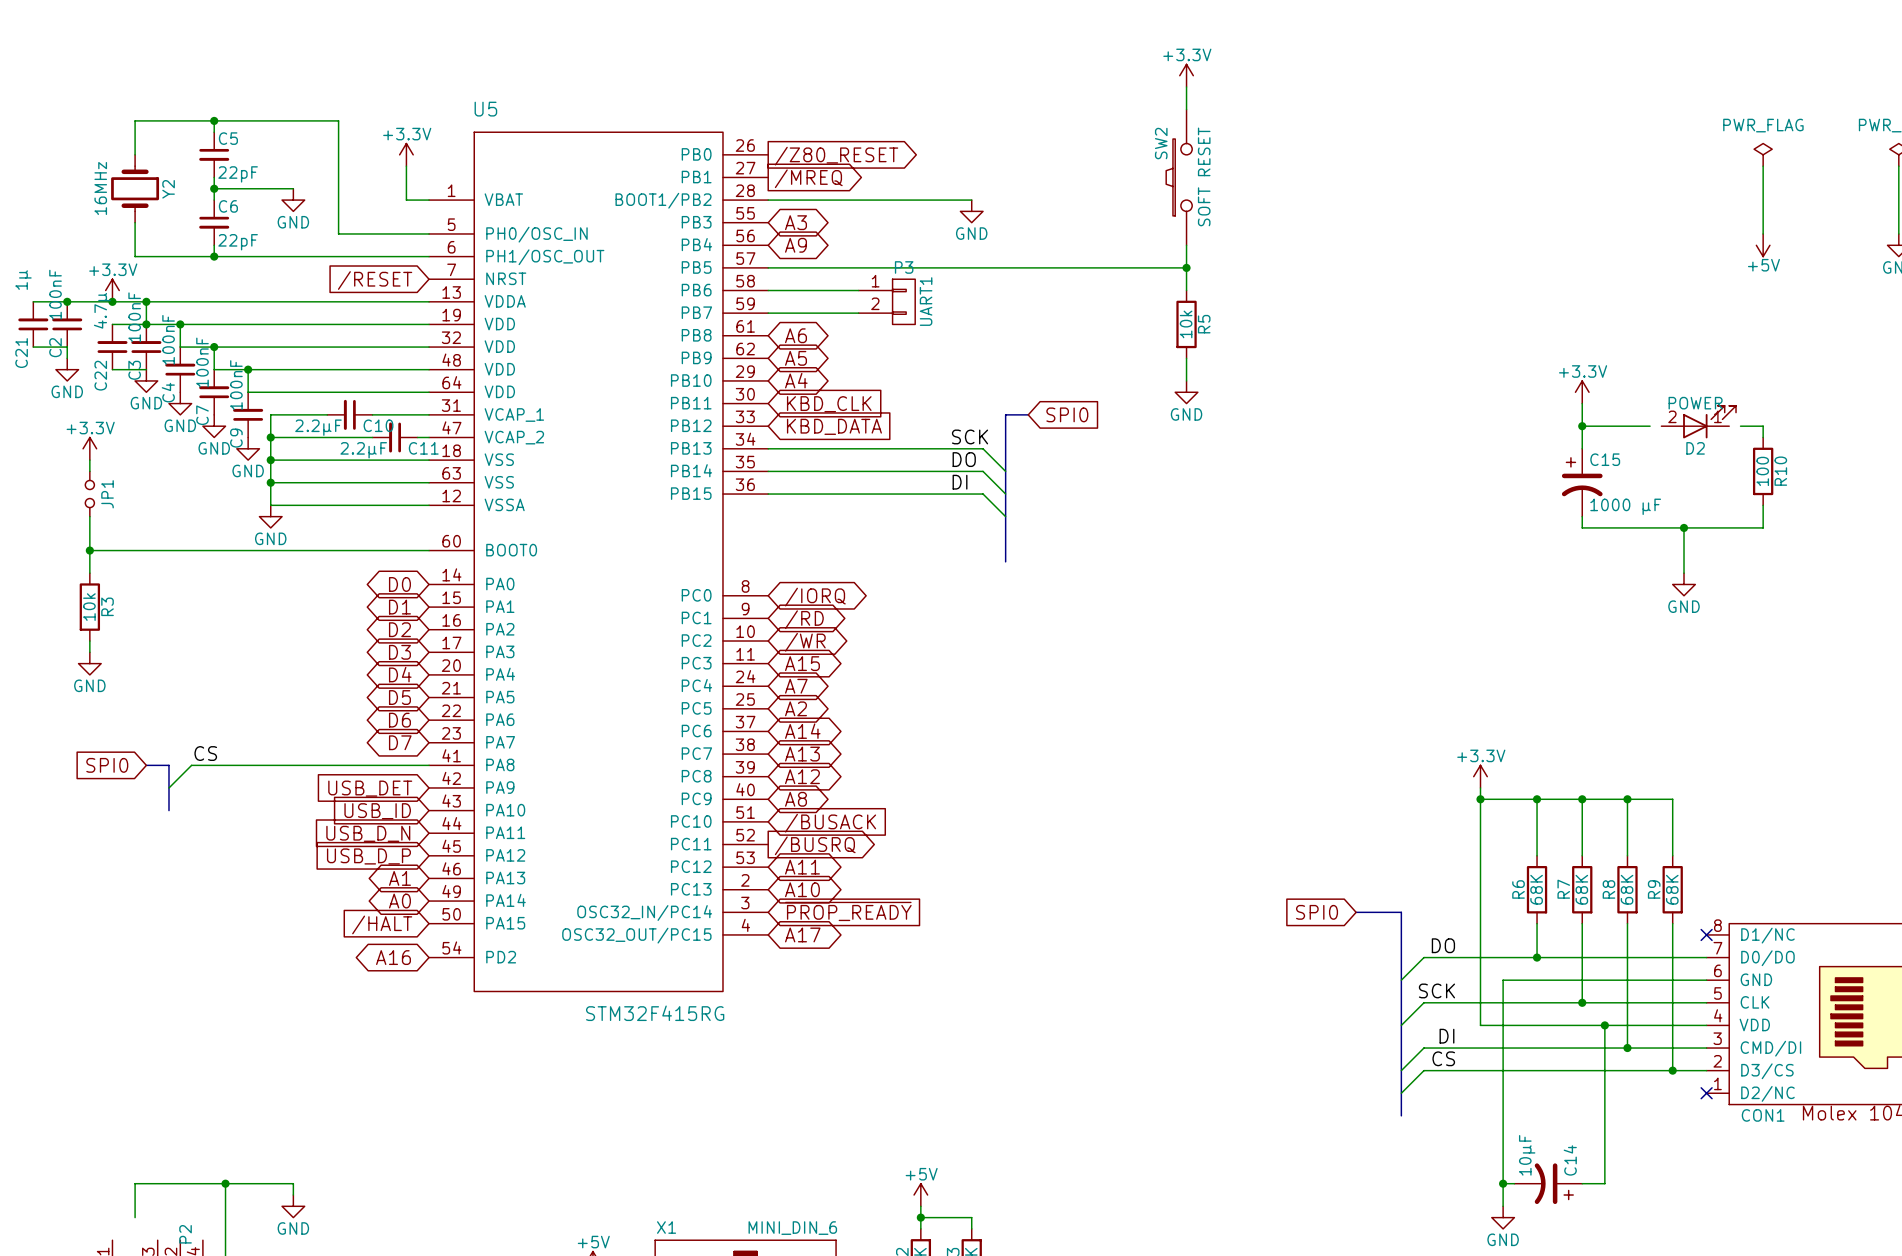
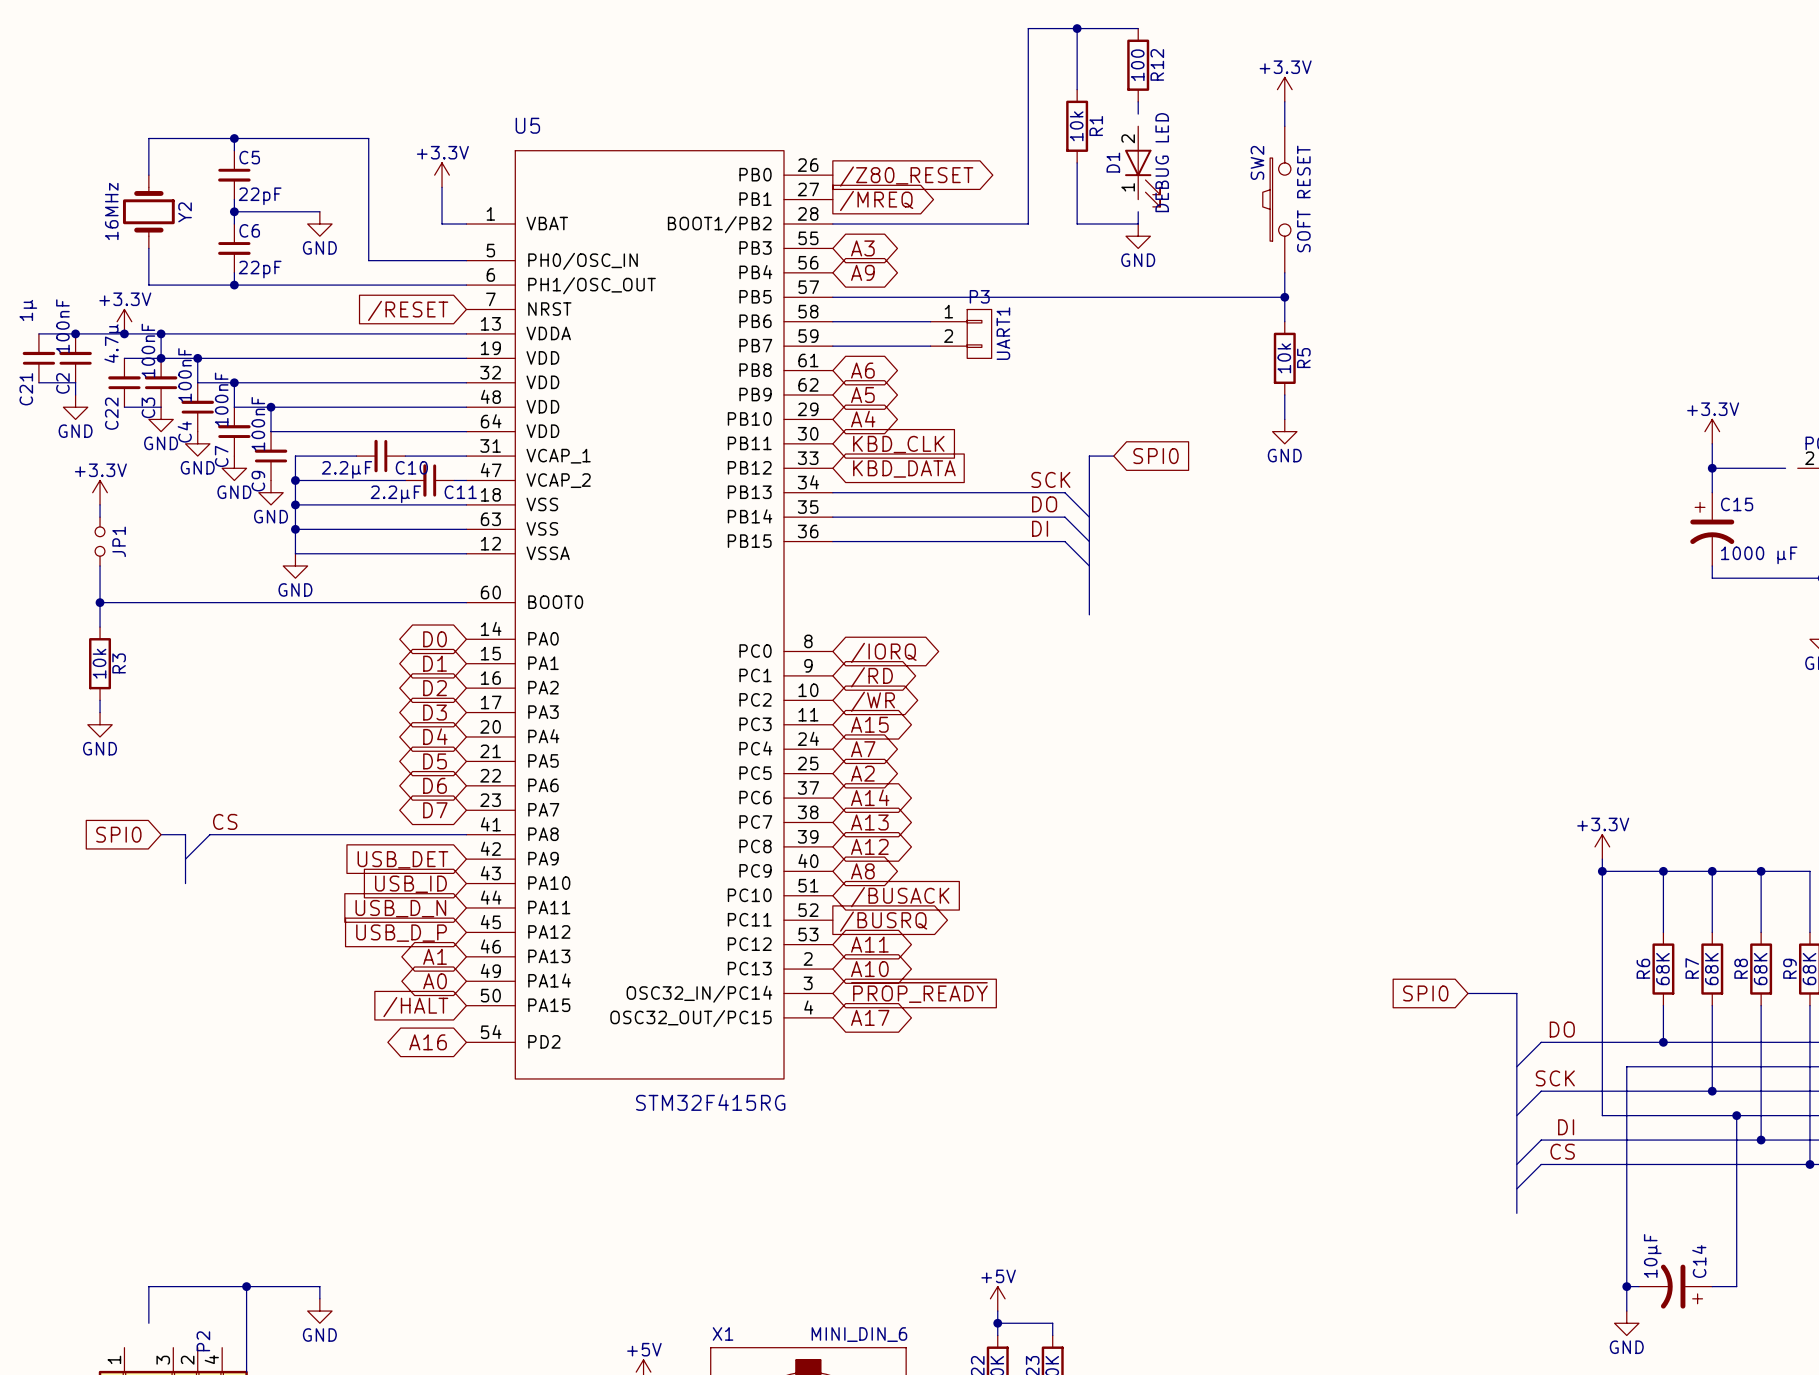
wire: none -> (1077, 28) (1077, 89)
junction: none -> (1077, 28)
R12: none -> 100 (1138, 65)
wire: none -> (1138, 101) (1138, 114)
R1: none -> 10k (1077, 126)
wire: none -> (1077, 162) (1077, 223) (1138, 223) (1138, 211)
D1: none -> DEBUG LED (1142, 166)
wire: (949, 200) (971, 200) -> (1028, 223) (1028, 28) (1138, 28)
power symbol position: GND (971, 211) -> GND (1138, 236)

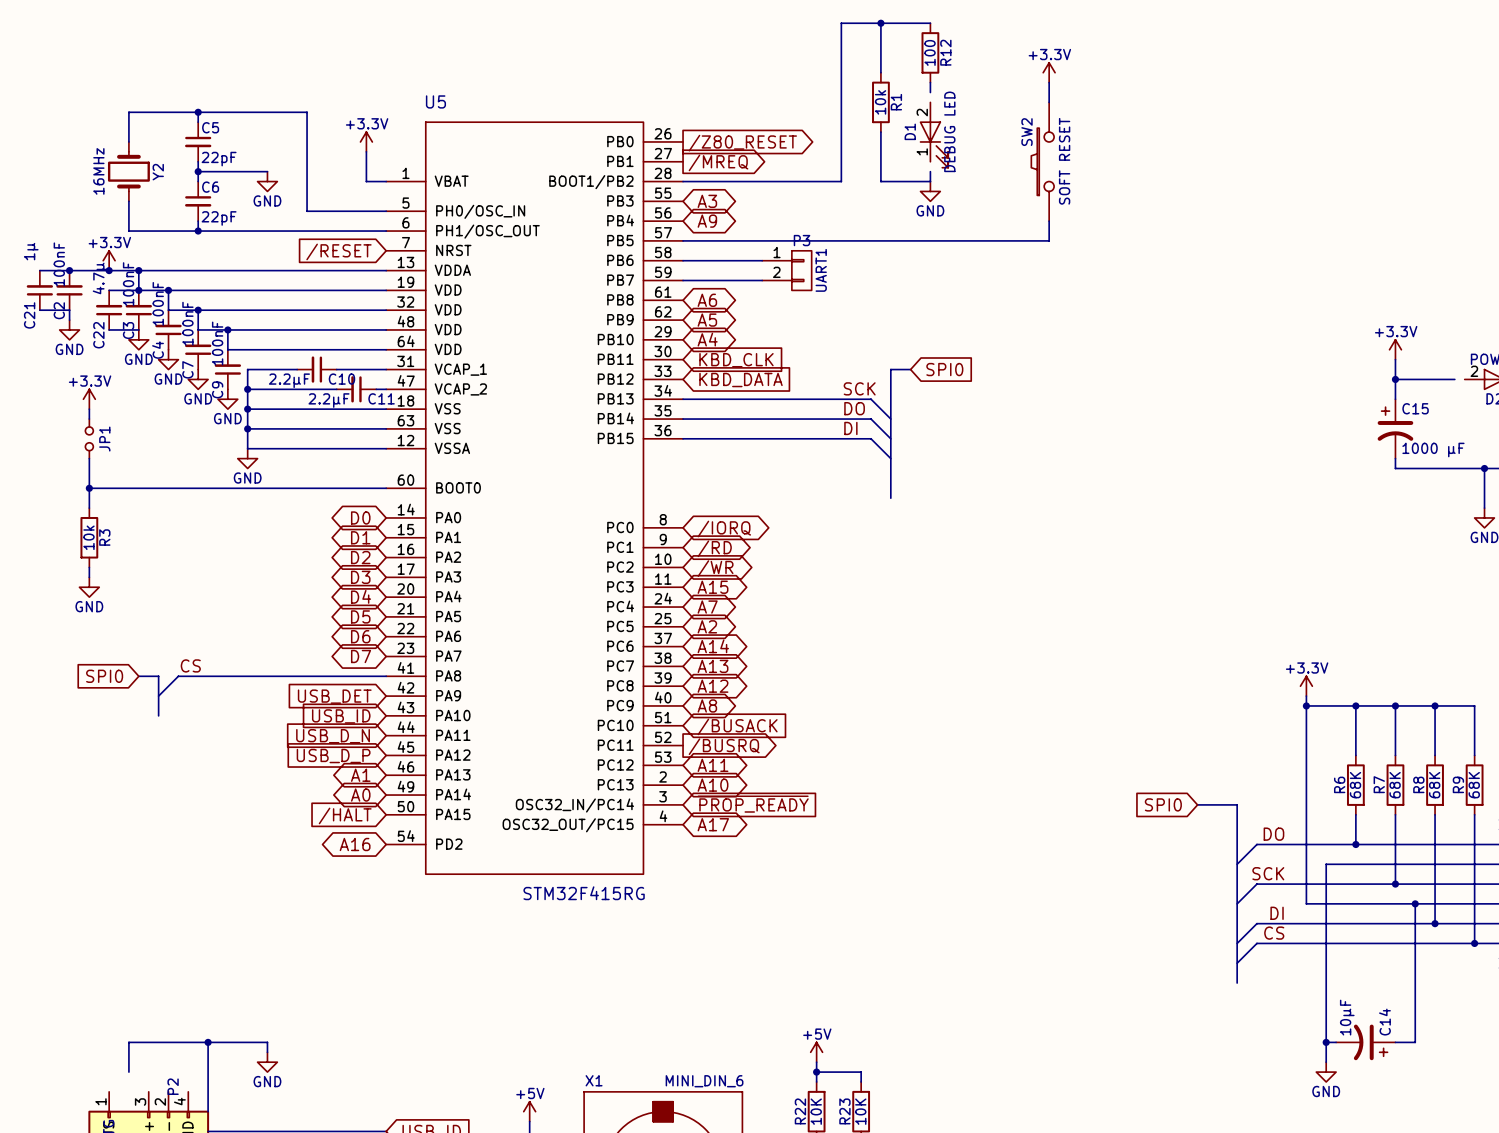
wire: (1284, 297) (1284, 321) -> none
junction: (1284, 297) -> none
R5: 10k (1284, 358) -> none
wire: (1284, 394) (1284, 419) -> none
power symbol: GND (1284, 431) -> none

